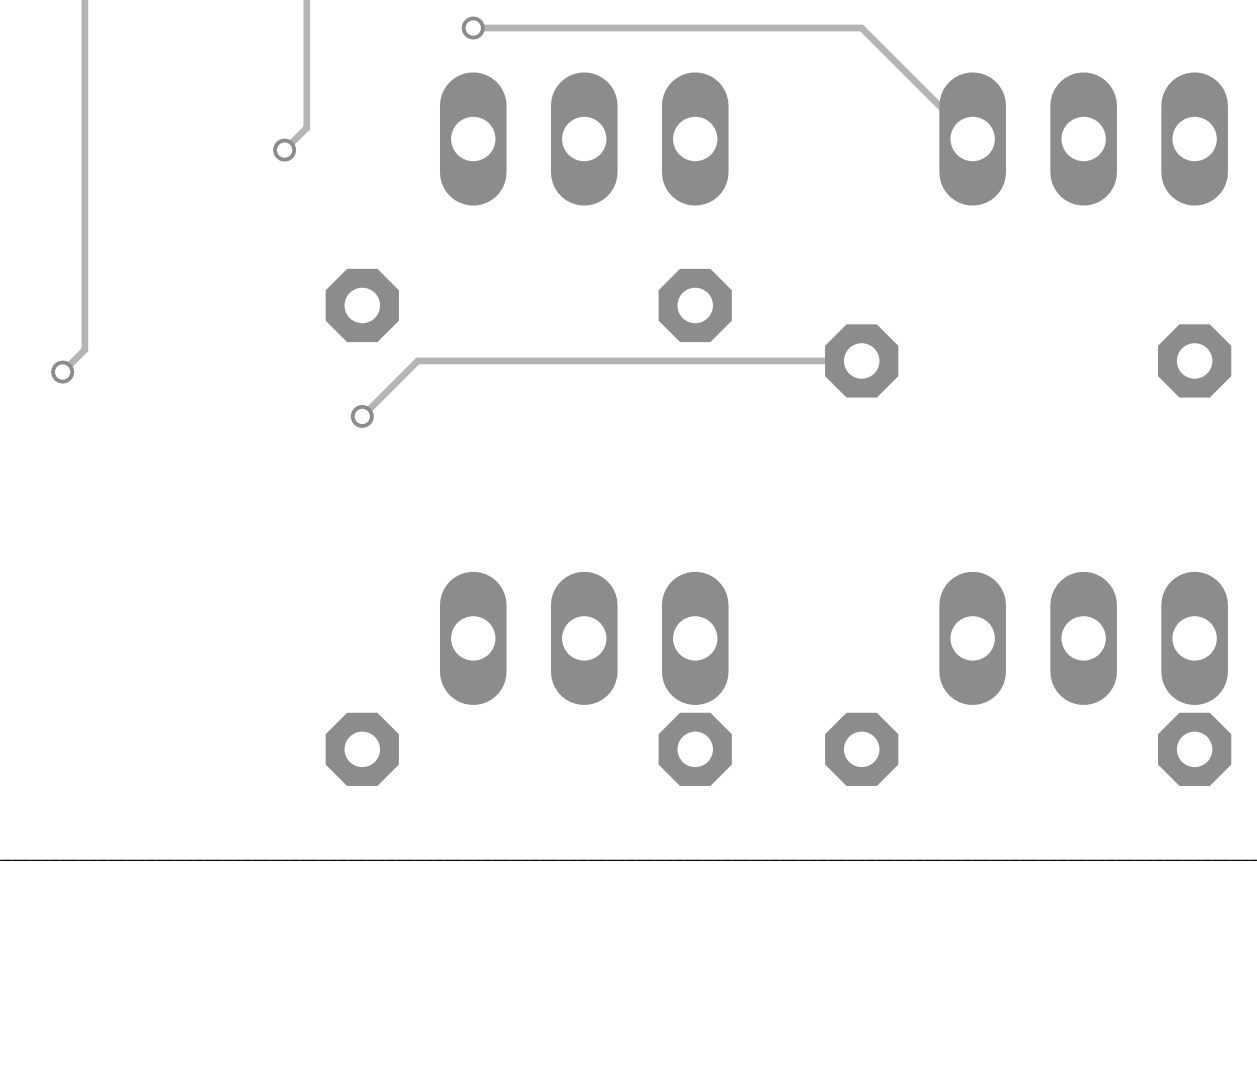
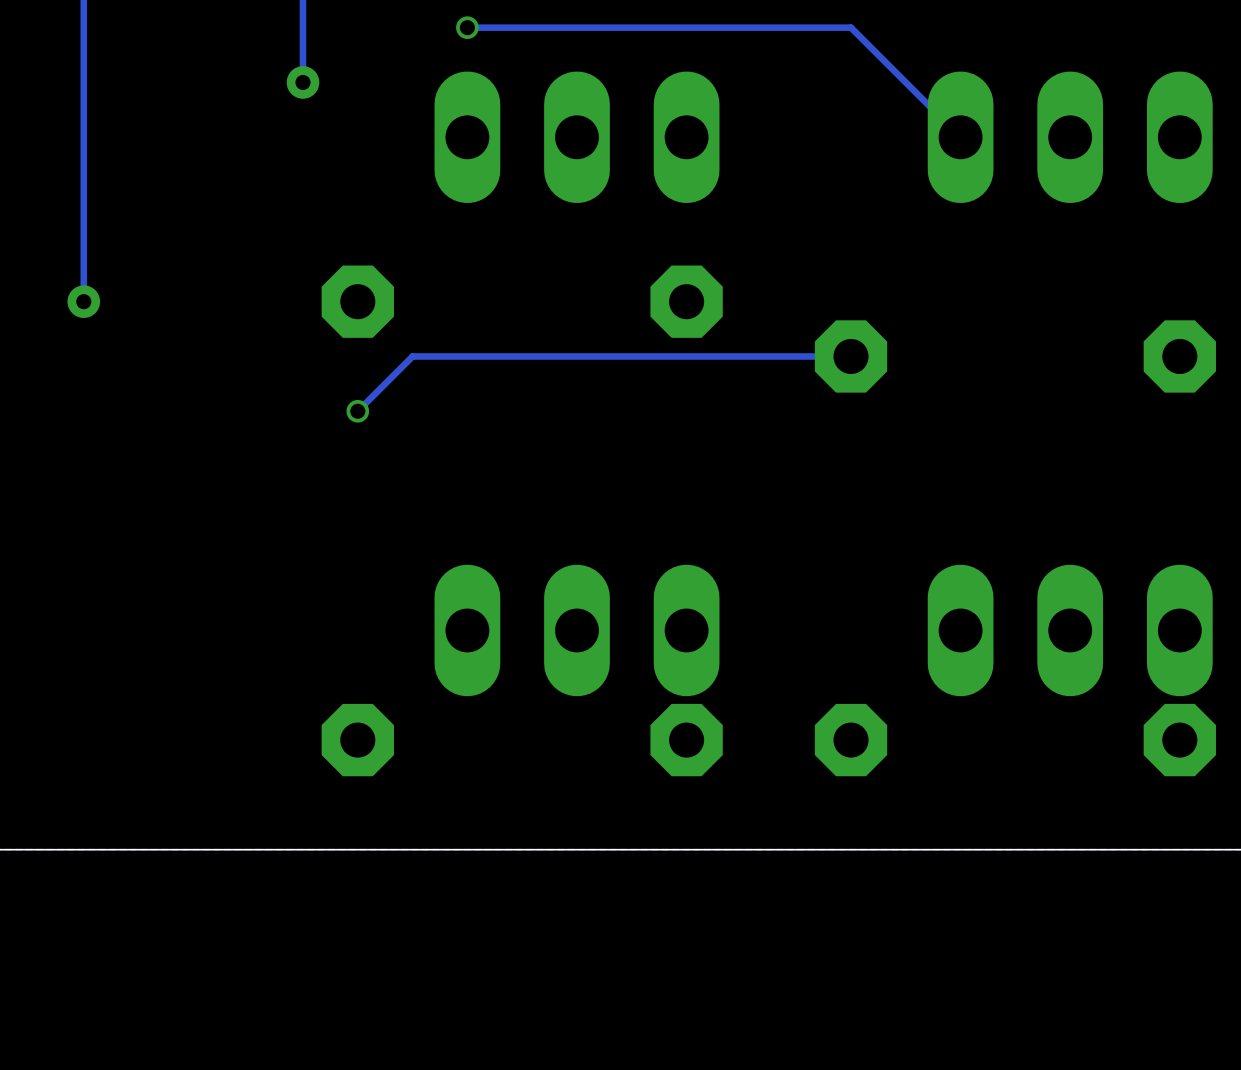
track: (306, 83) (306, 127) (284, 150) -> none
via: none -> (302, 82)
via: (284, 150) -> none
track: (84, 305) (84, 349) (62, 372) -> none
via: none -> (83, 301)
via: (62, 372) -> none

